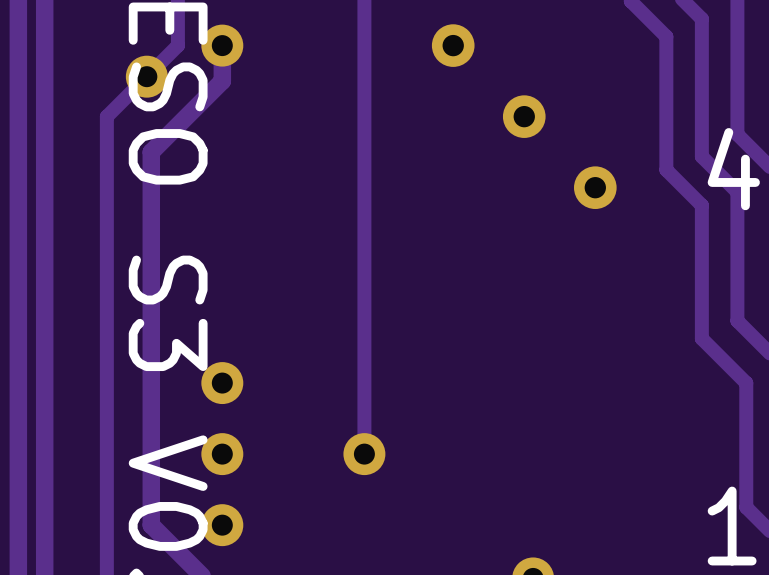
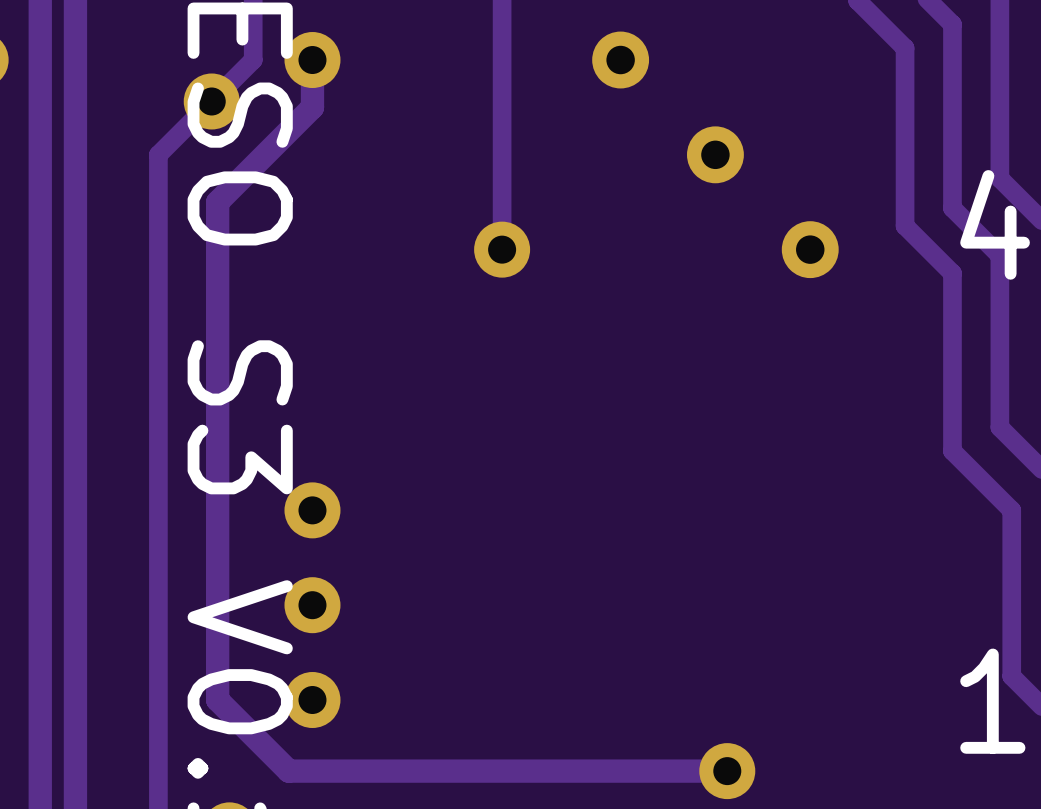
track: (364, 187) (364, 454) -> none
via position: (364, 454) -> (502, 249)

